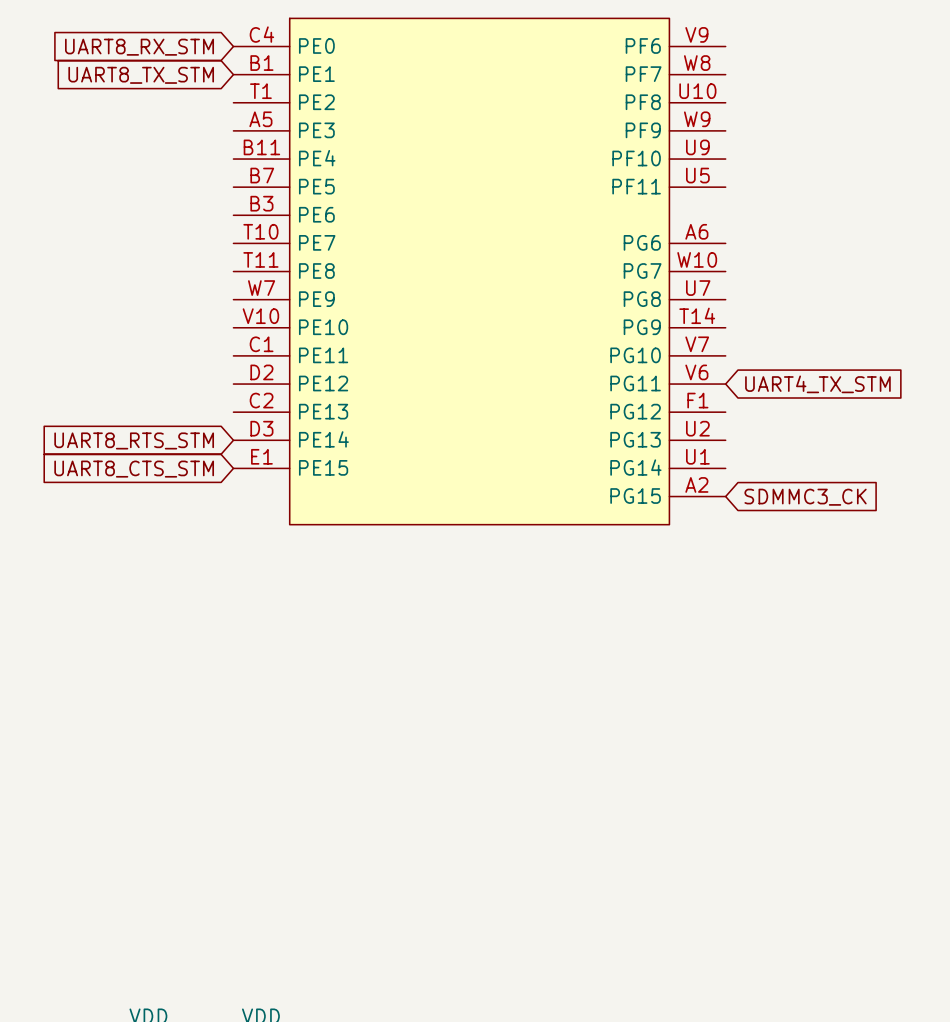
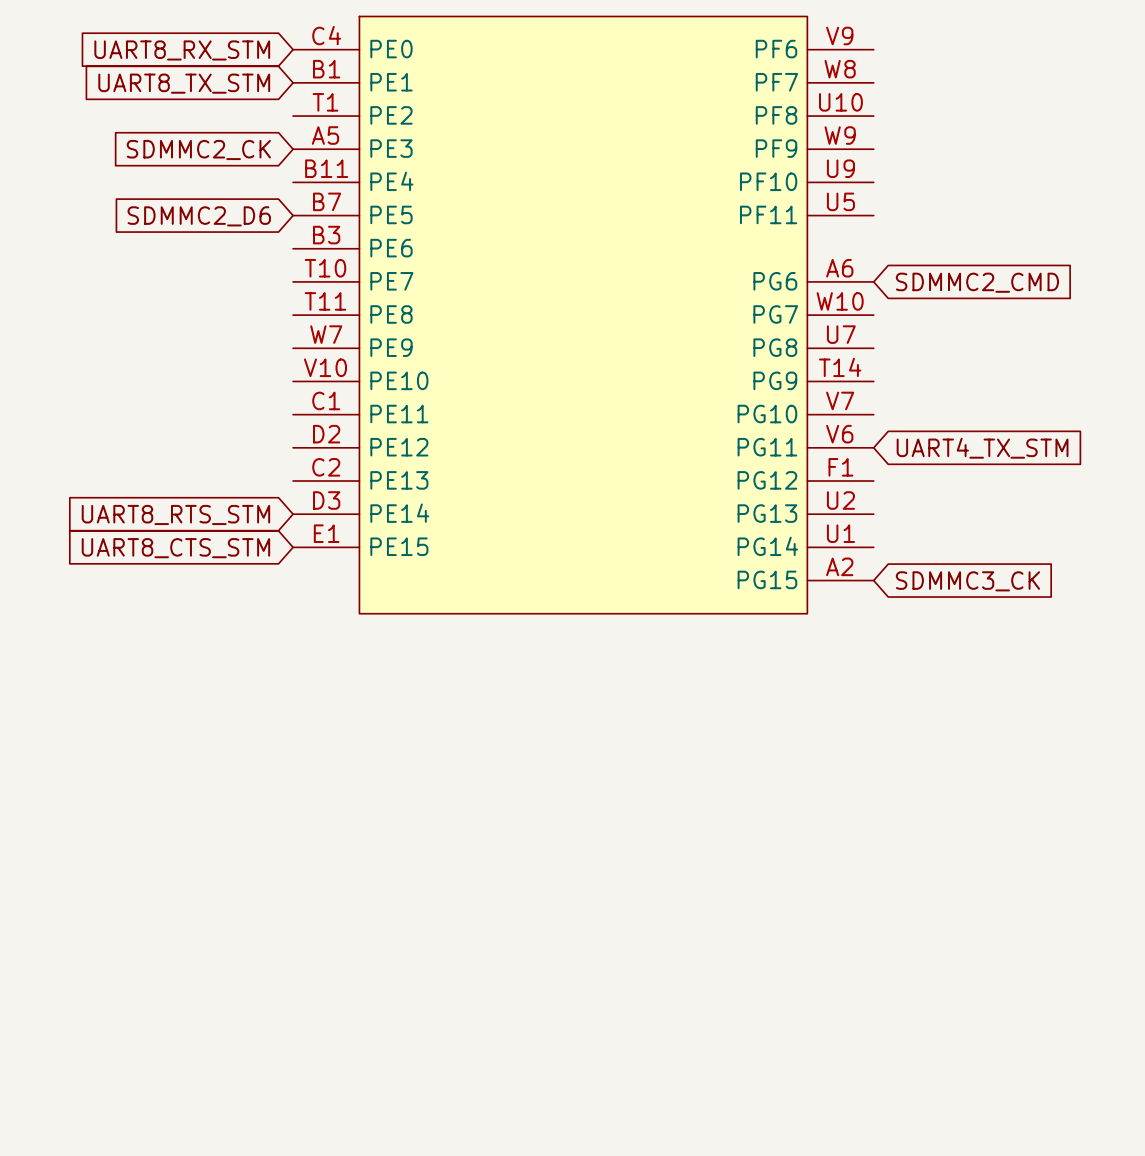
global label: none -> SDMMC2_CK (198, 150)
global label: none -> SDMMC2_D6 (199, 216)
global label: none -> SDMMC2_CMD (977, 282)

